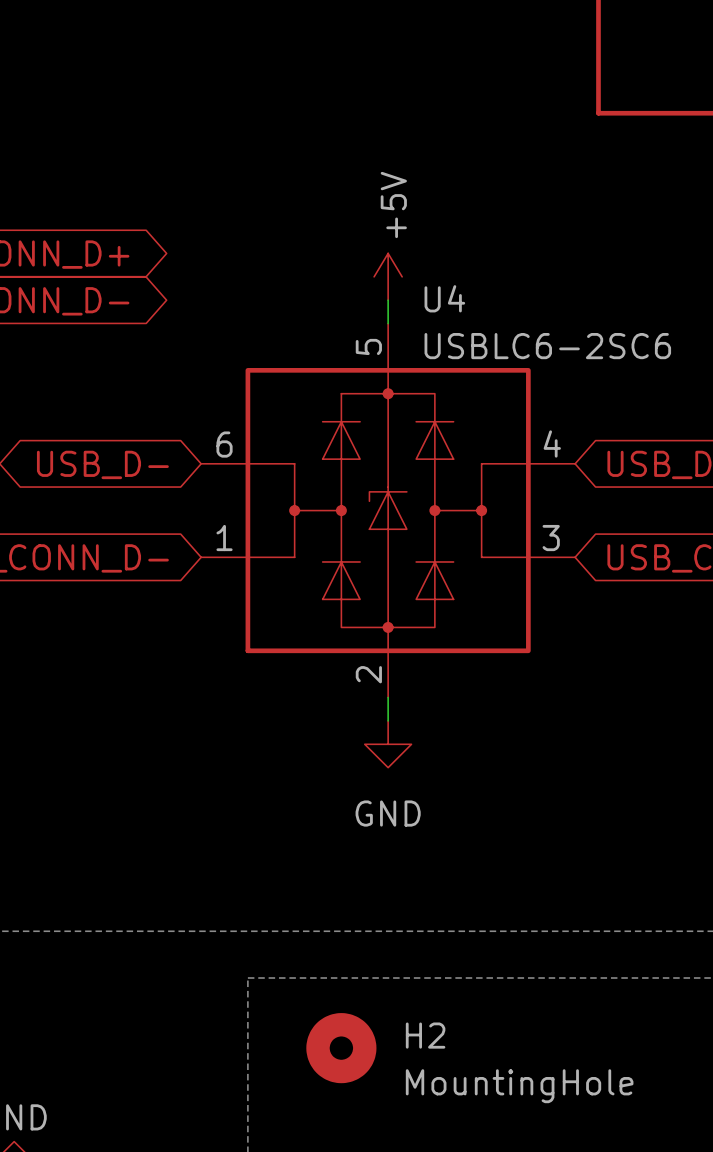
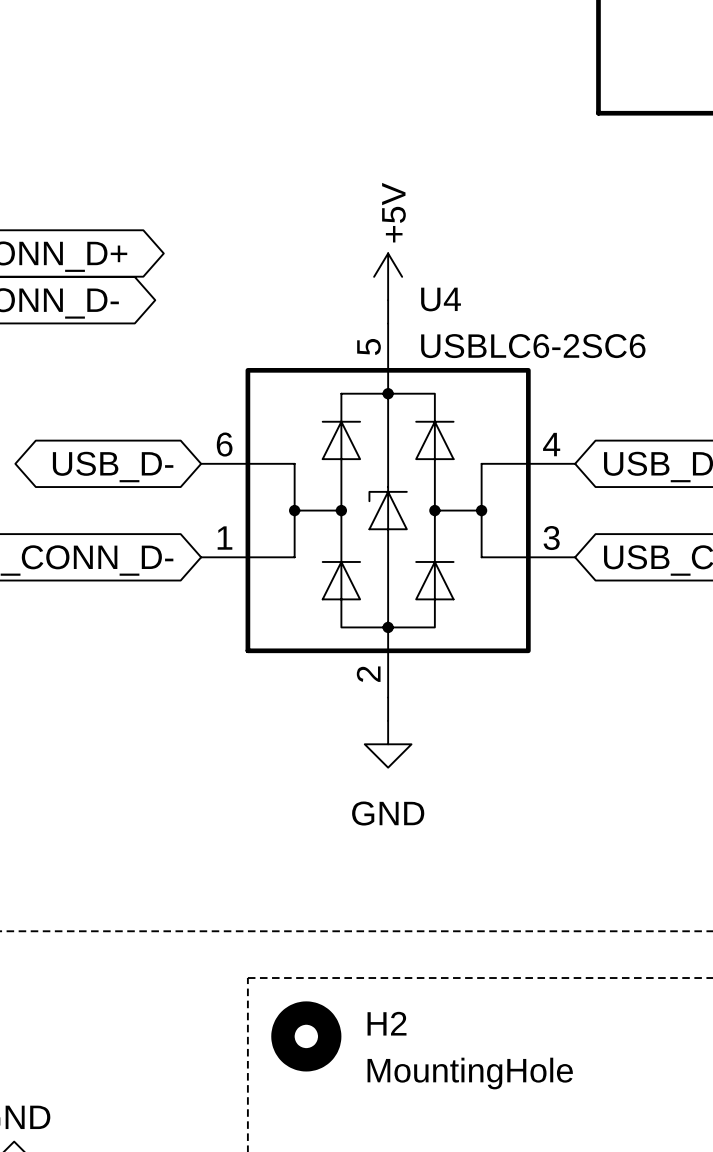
H2 position: (341, 1048) -> (306, 1036)

